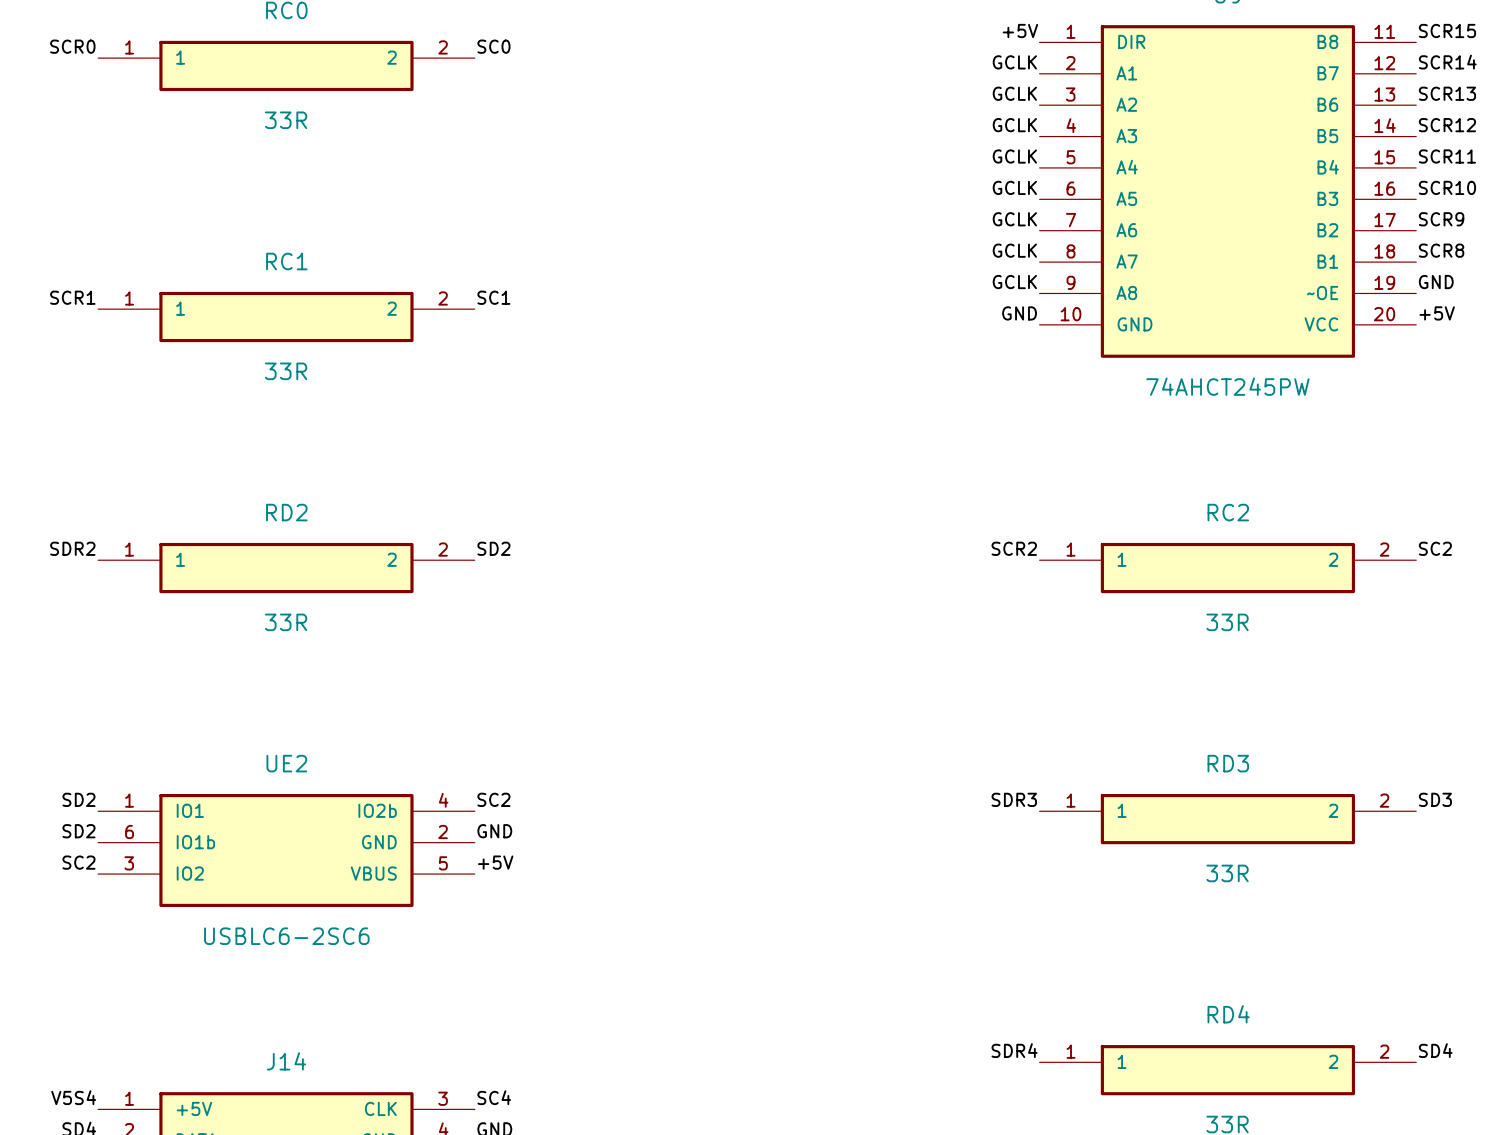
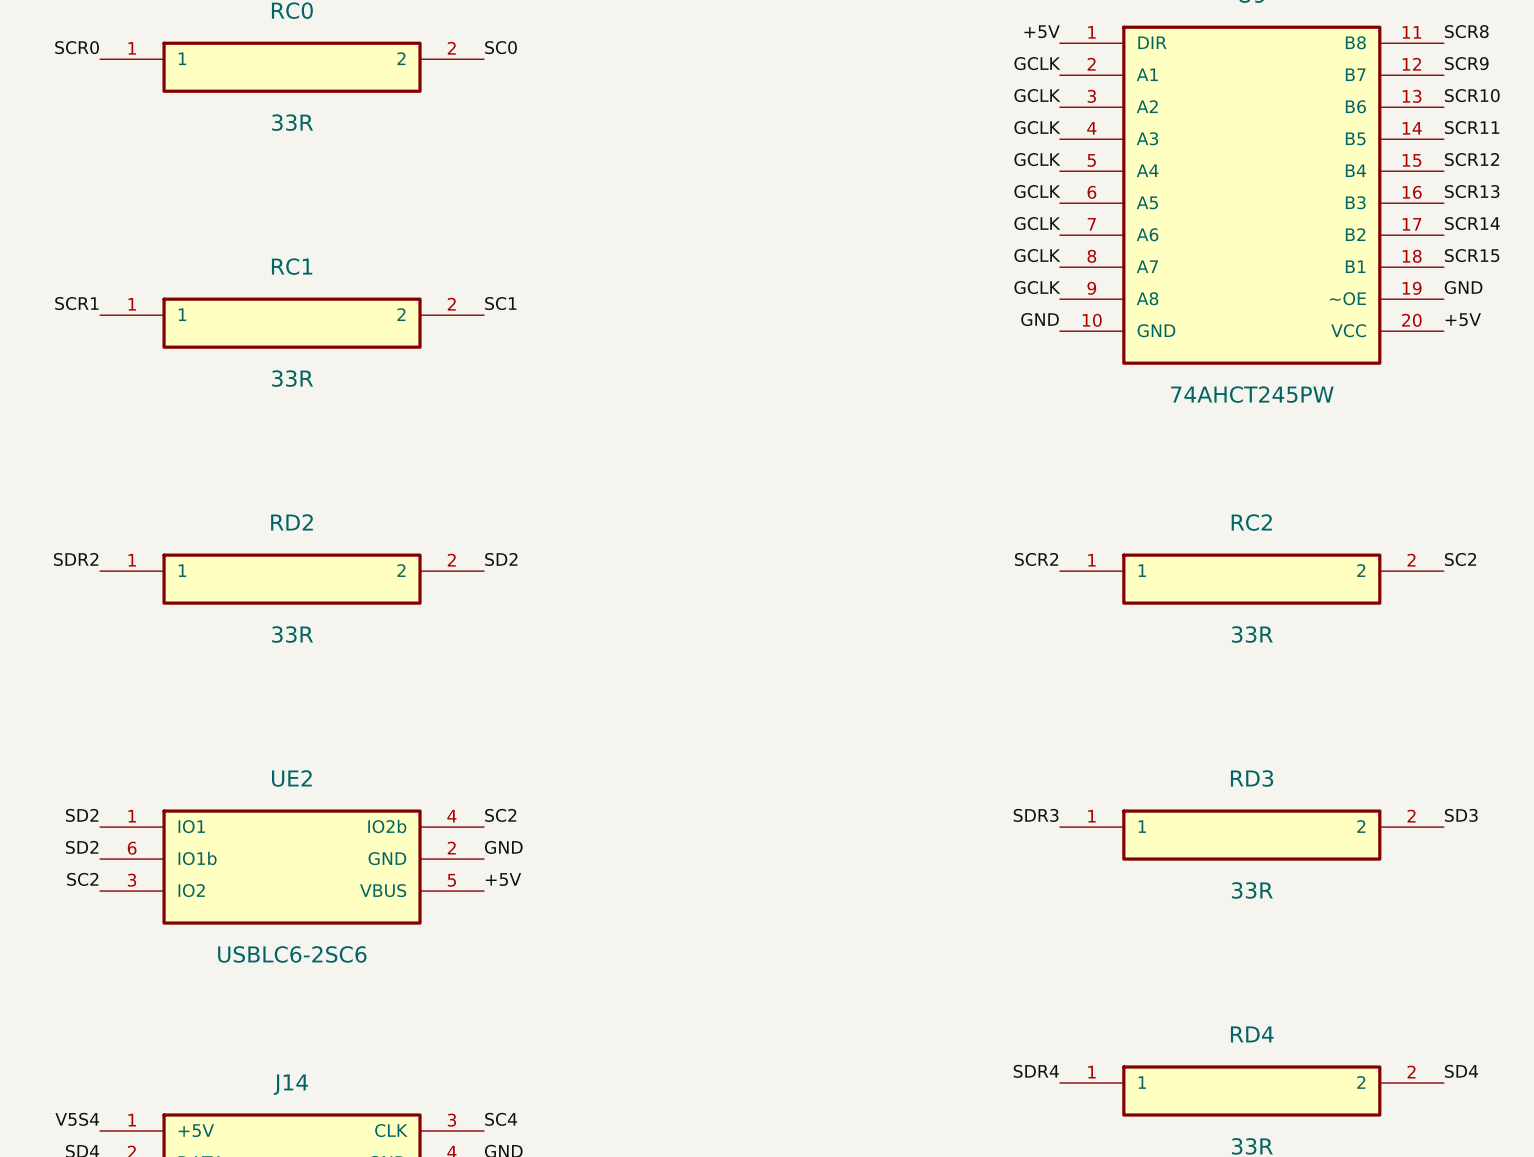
label: SCR15 (1447, 30) -> SCR8 (1466, 31)
label: SCR14 (1447, 62) -> SCR9 (1466, 63)
label: SCR13 (1447, 93) -> SCR10 (1472, 95)
label: SCR12 (1447, 125) -> SCR11 (1472, 127)
label: SCR11 (1447, 156) -> SCR12 (1472, 159)
label: SCR10 (1447, 187) -> SCR13 (1472, 191)
label: SCR9 (1441, 219) -> SCR14 (1472, 223)
label: SCR8 (1441, 250) -> SCR15 (1472, 255)

